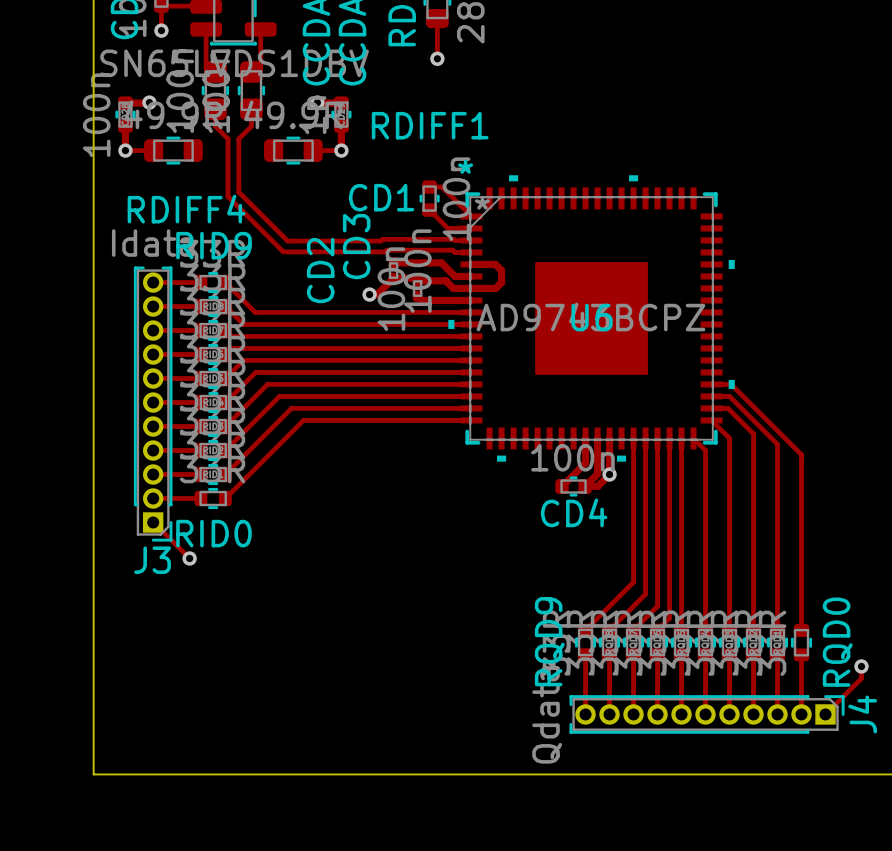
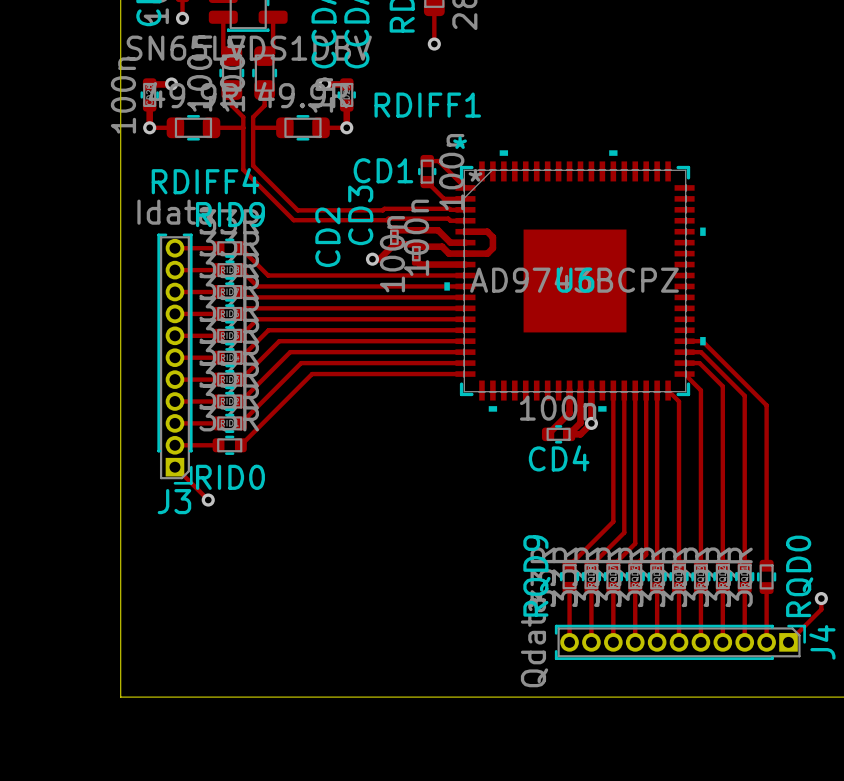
top track: none -> (211, 127) (243, 127)
top track: none -> (253, 127) (284, 127)

